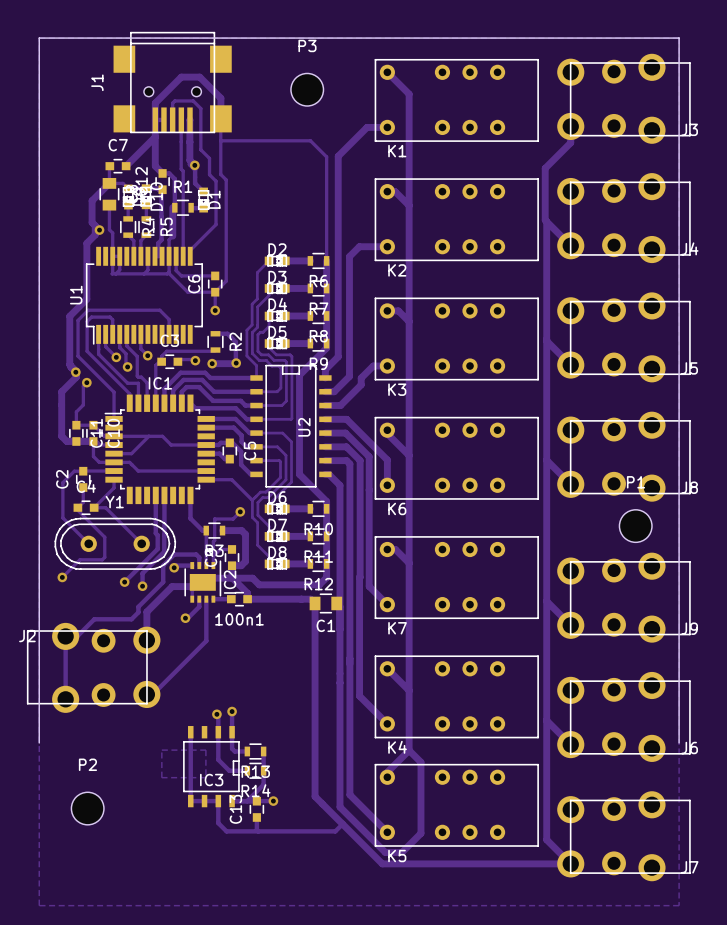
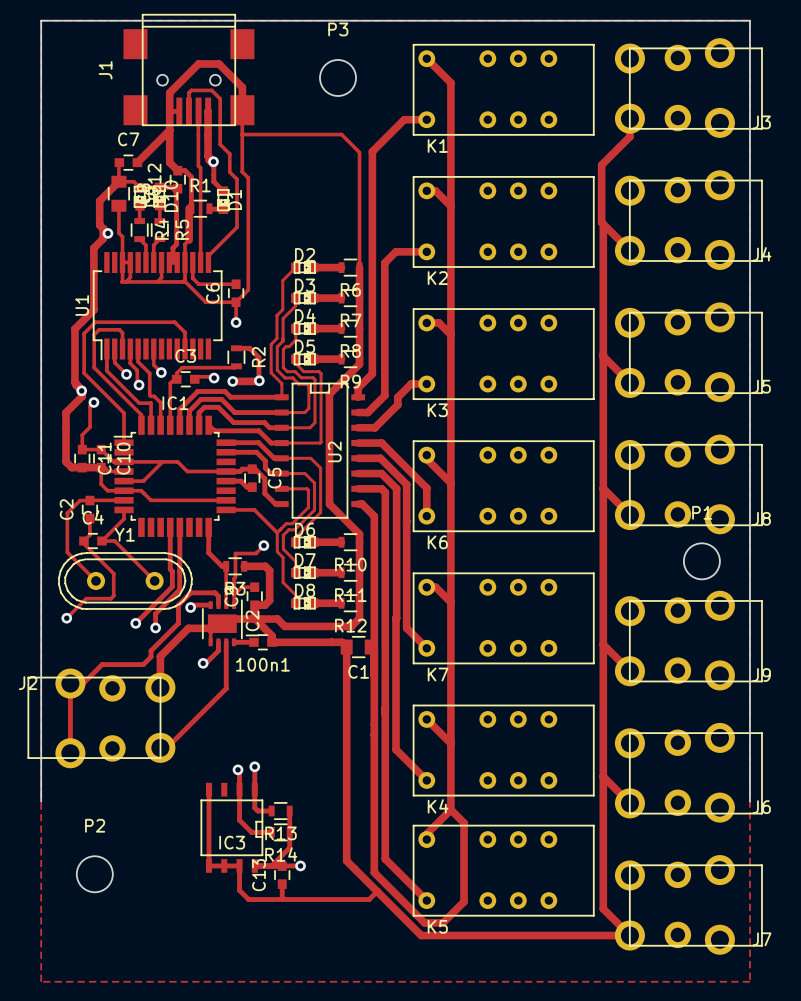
zone outline: (161, 750) (161, 777) (205, 777) (205, 750) (161, 750) -> none

